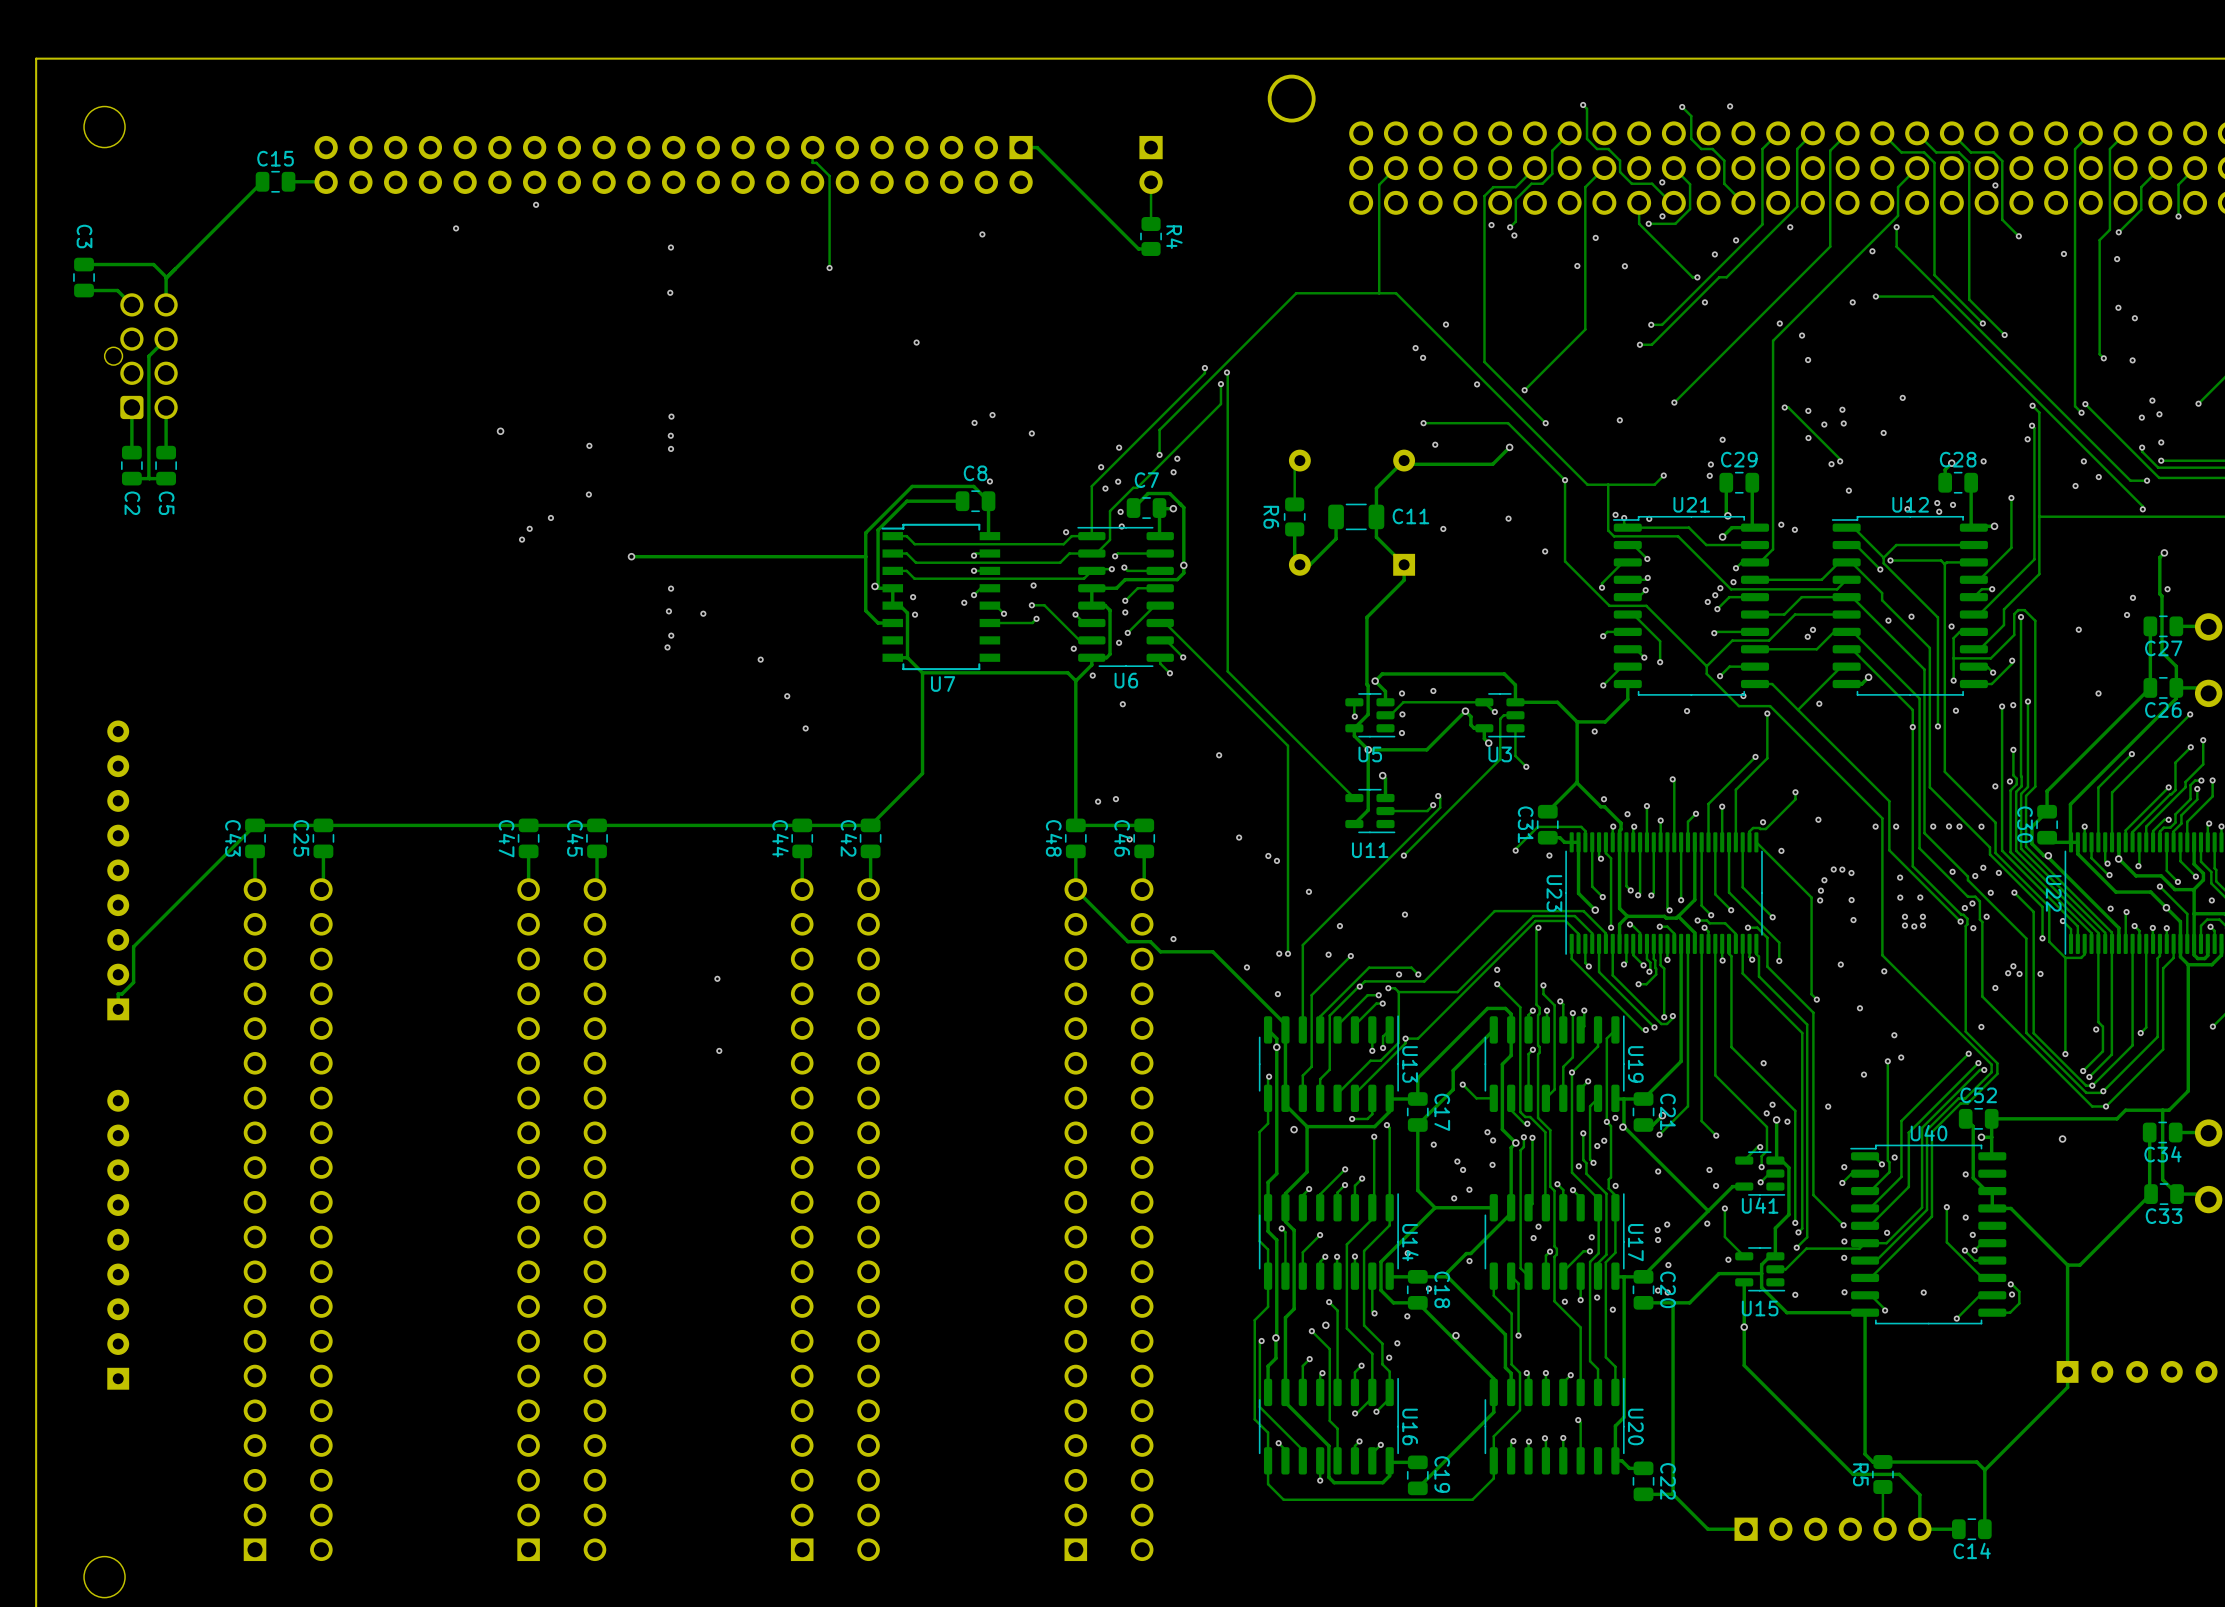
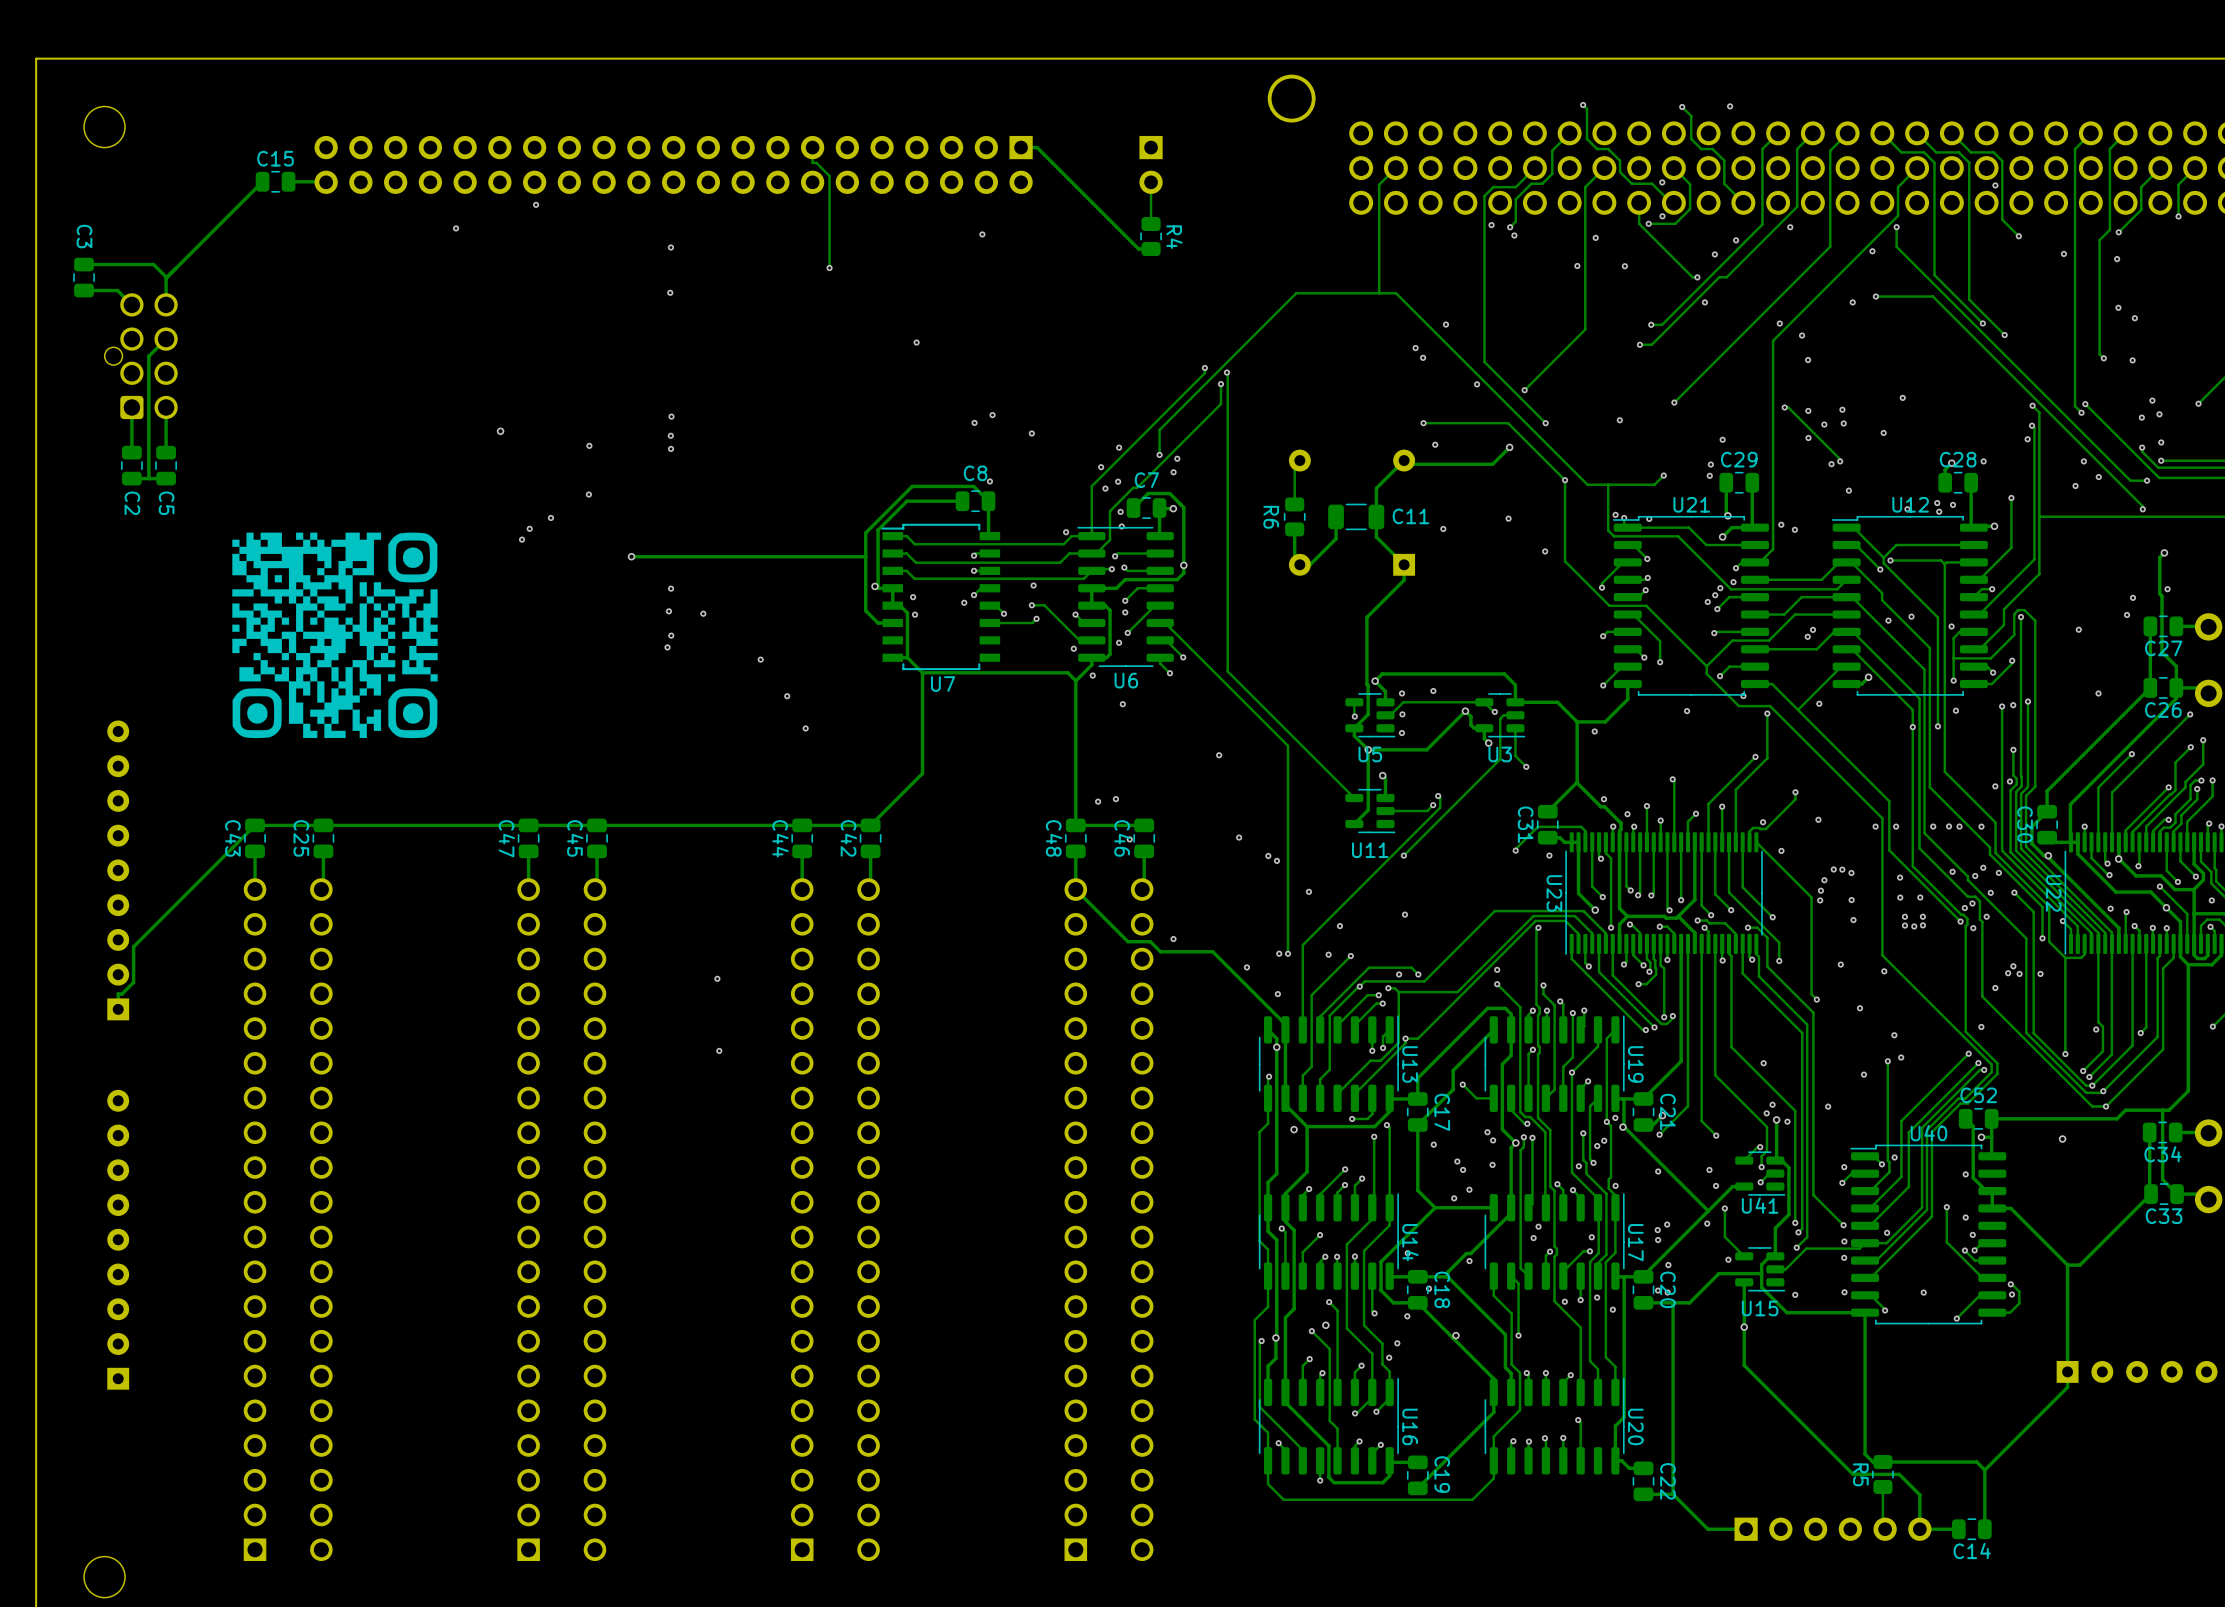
drawing: none -> [232, 532, 438, 739]

